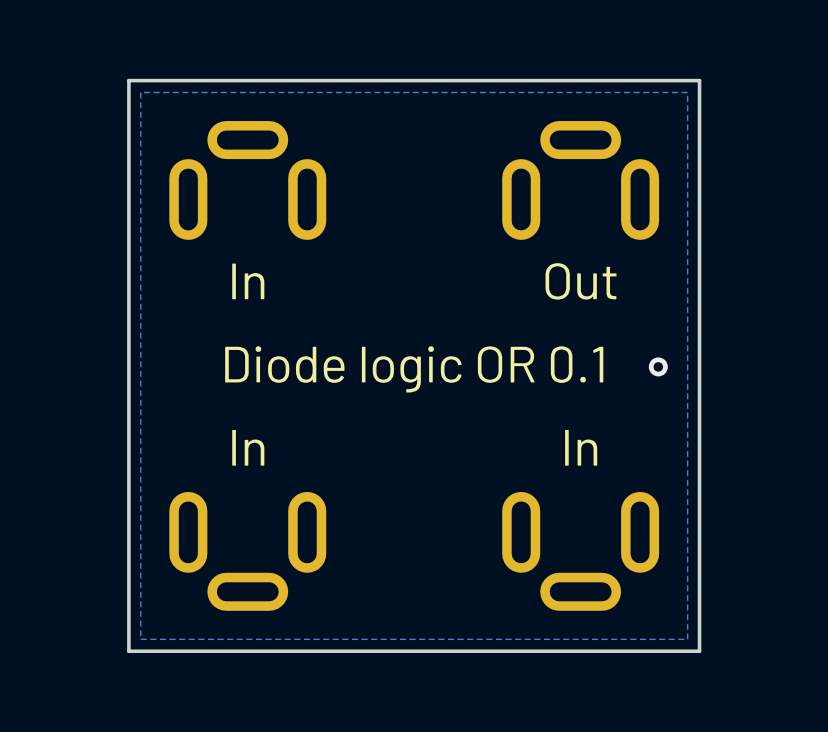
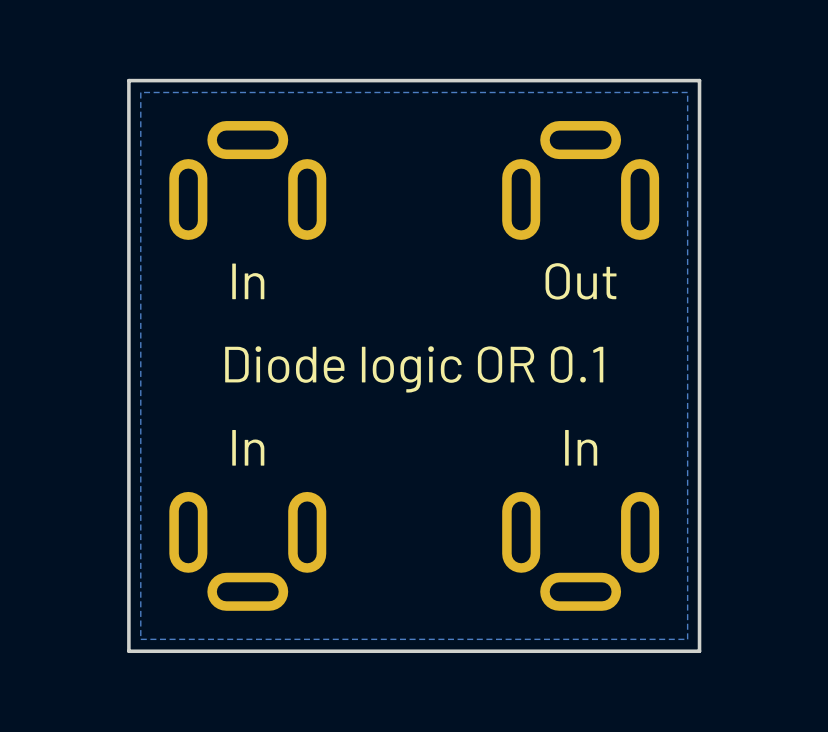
via: (658, 366) -> none

